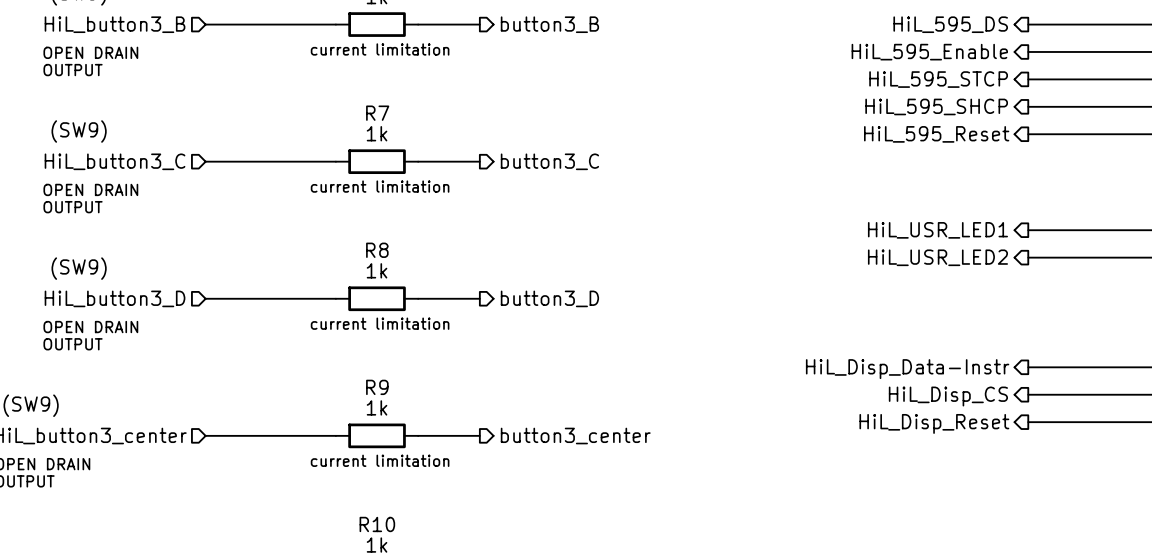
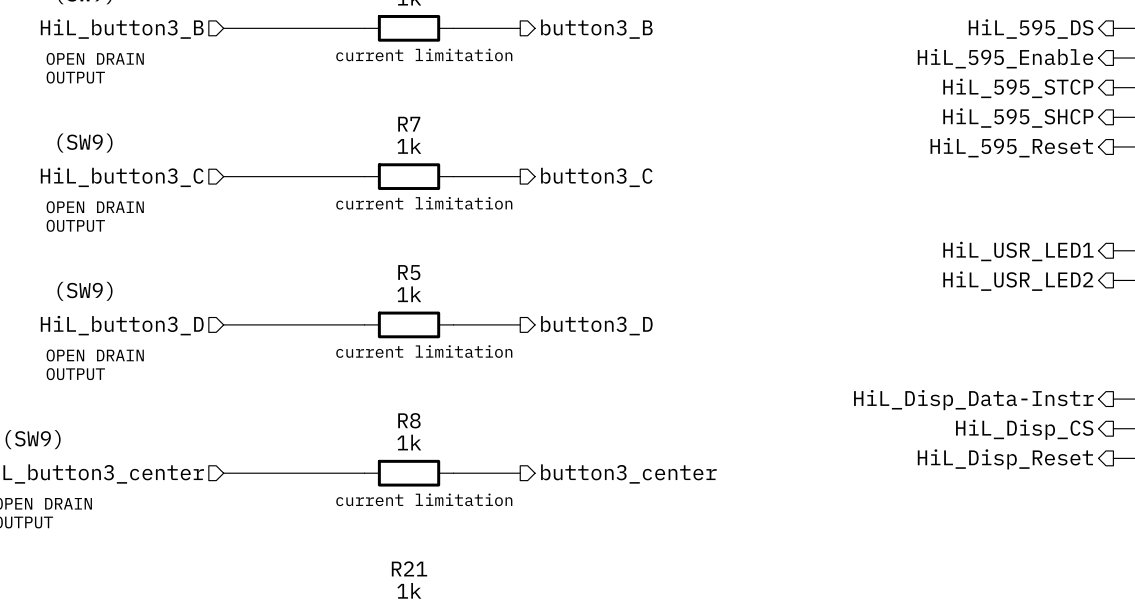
R8 name: R8 (377, 250) -> R5 (409, 272)
R9 name: R9 (377, 387) -> R8 (409, 420)
R10 name: R10 (377, 524) -> R21 (409, 568)

